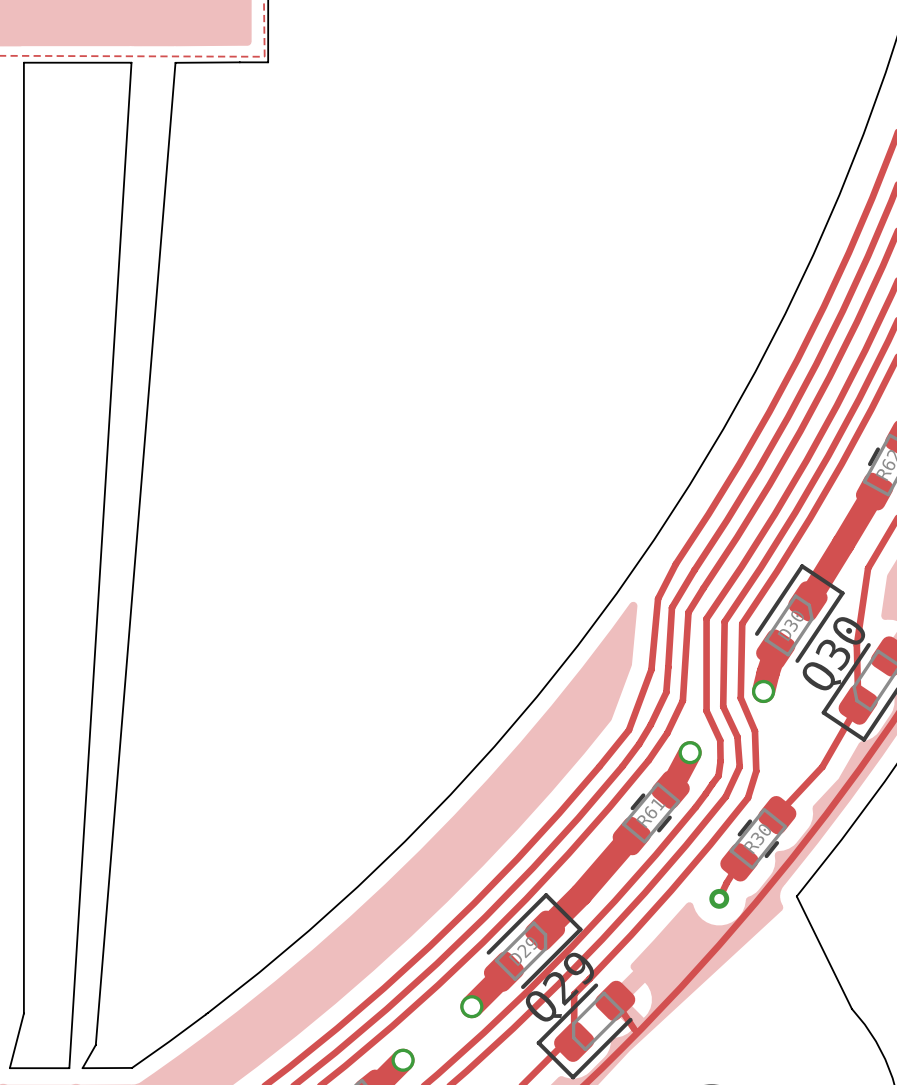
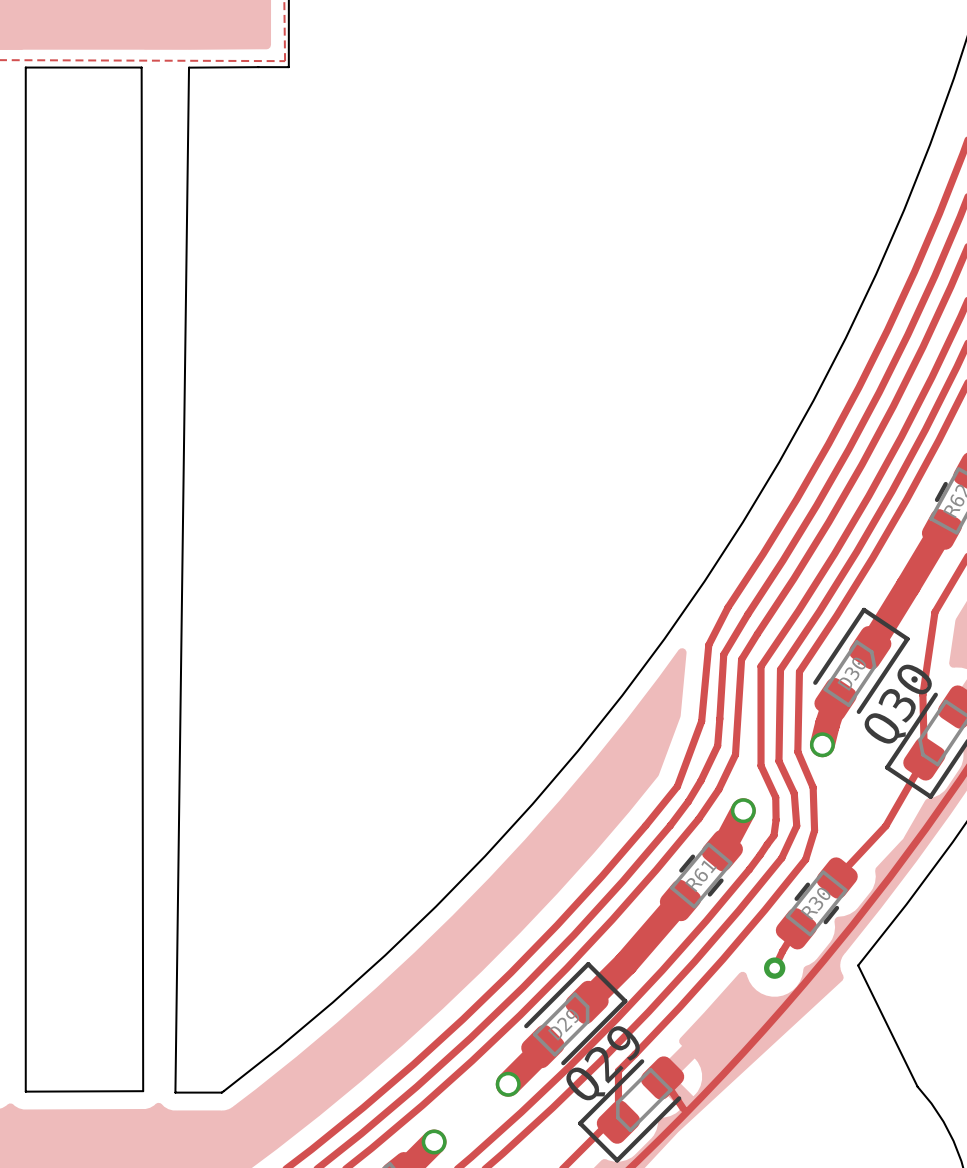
board edge: (131, 62) (69, 1068) (9, 1068) (23, 1013) -> (141, 67) (143, 1091) (25, 1091)
board edge: (175, 62) (95, 1045) (82, 1068) (132, 1067) (205, 1014) -> (189, 67) (175, 1092) (221, 1092)

